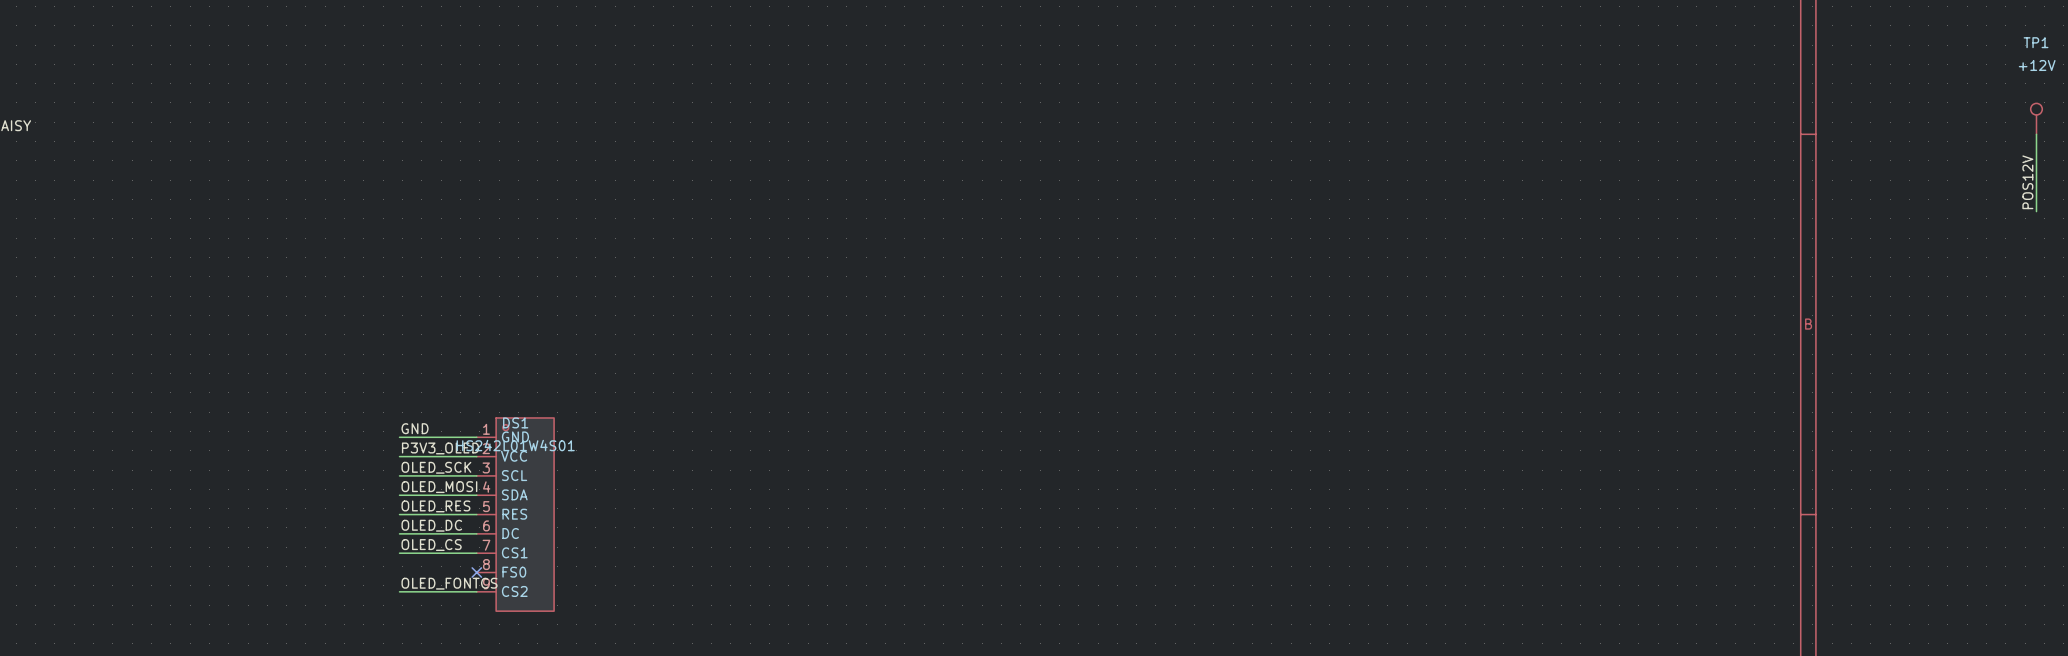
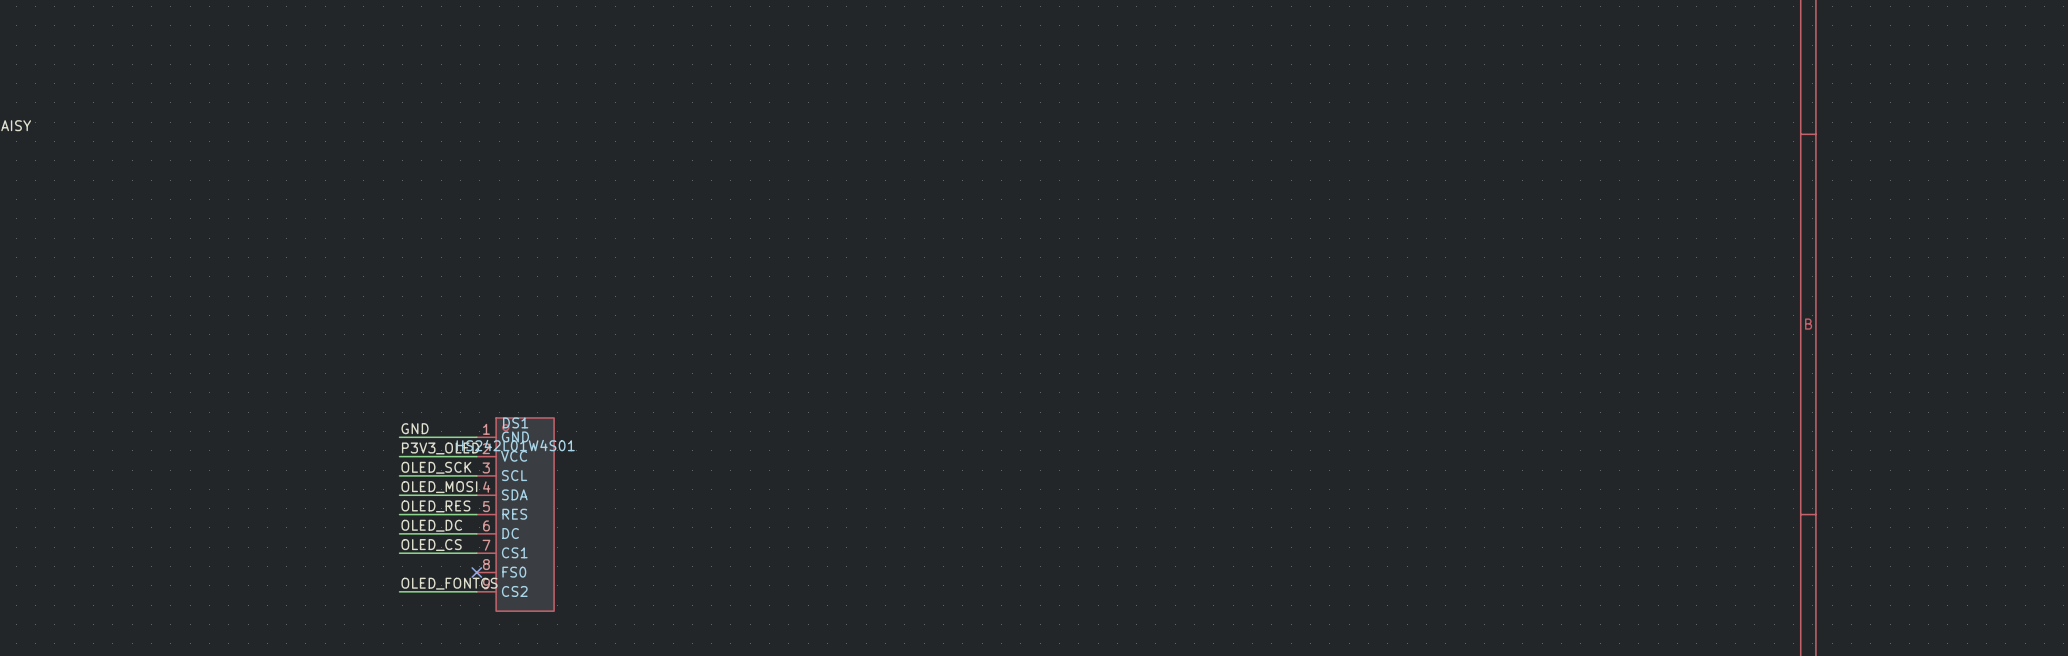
TP1: +12V (2036, 118) -> none
wire: (2036, 134) (2036, 211) -> none
label: POS12V (2027, 182) -> none

